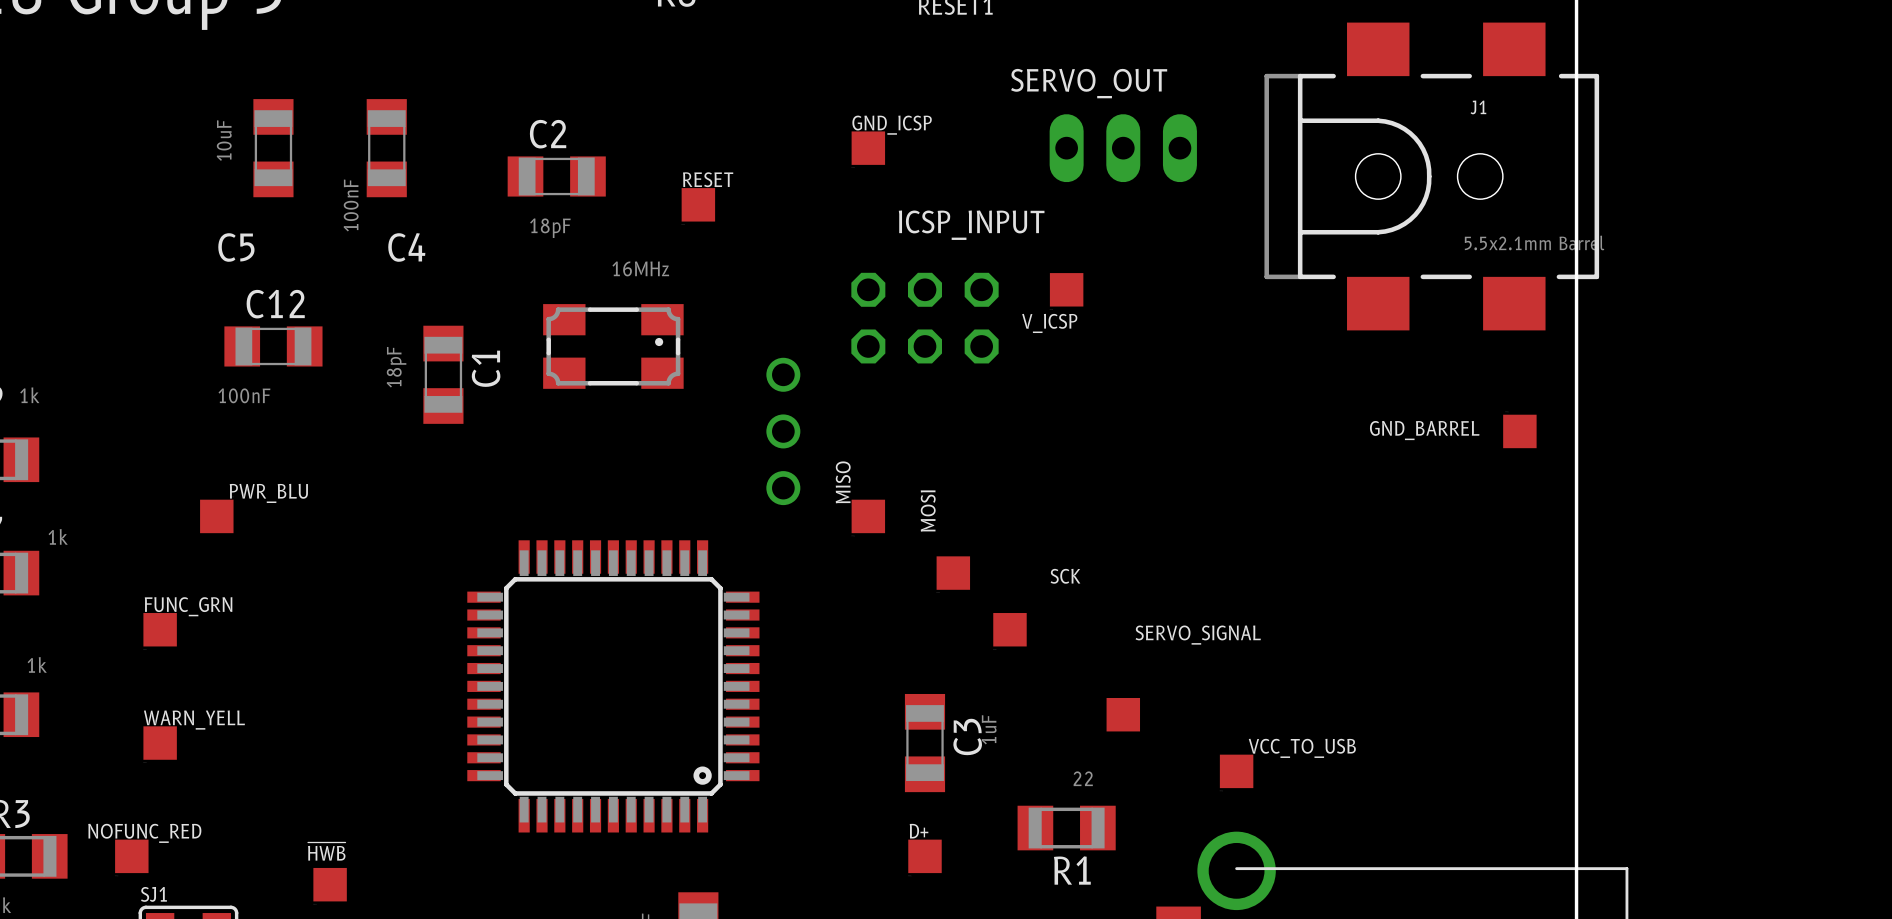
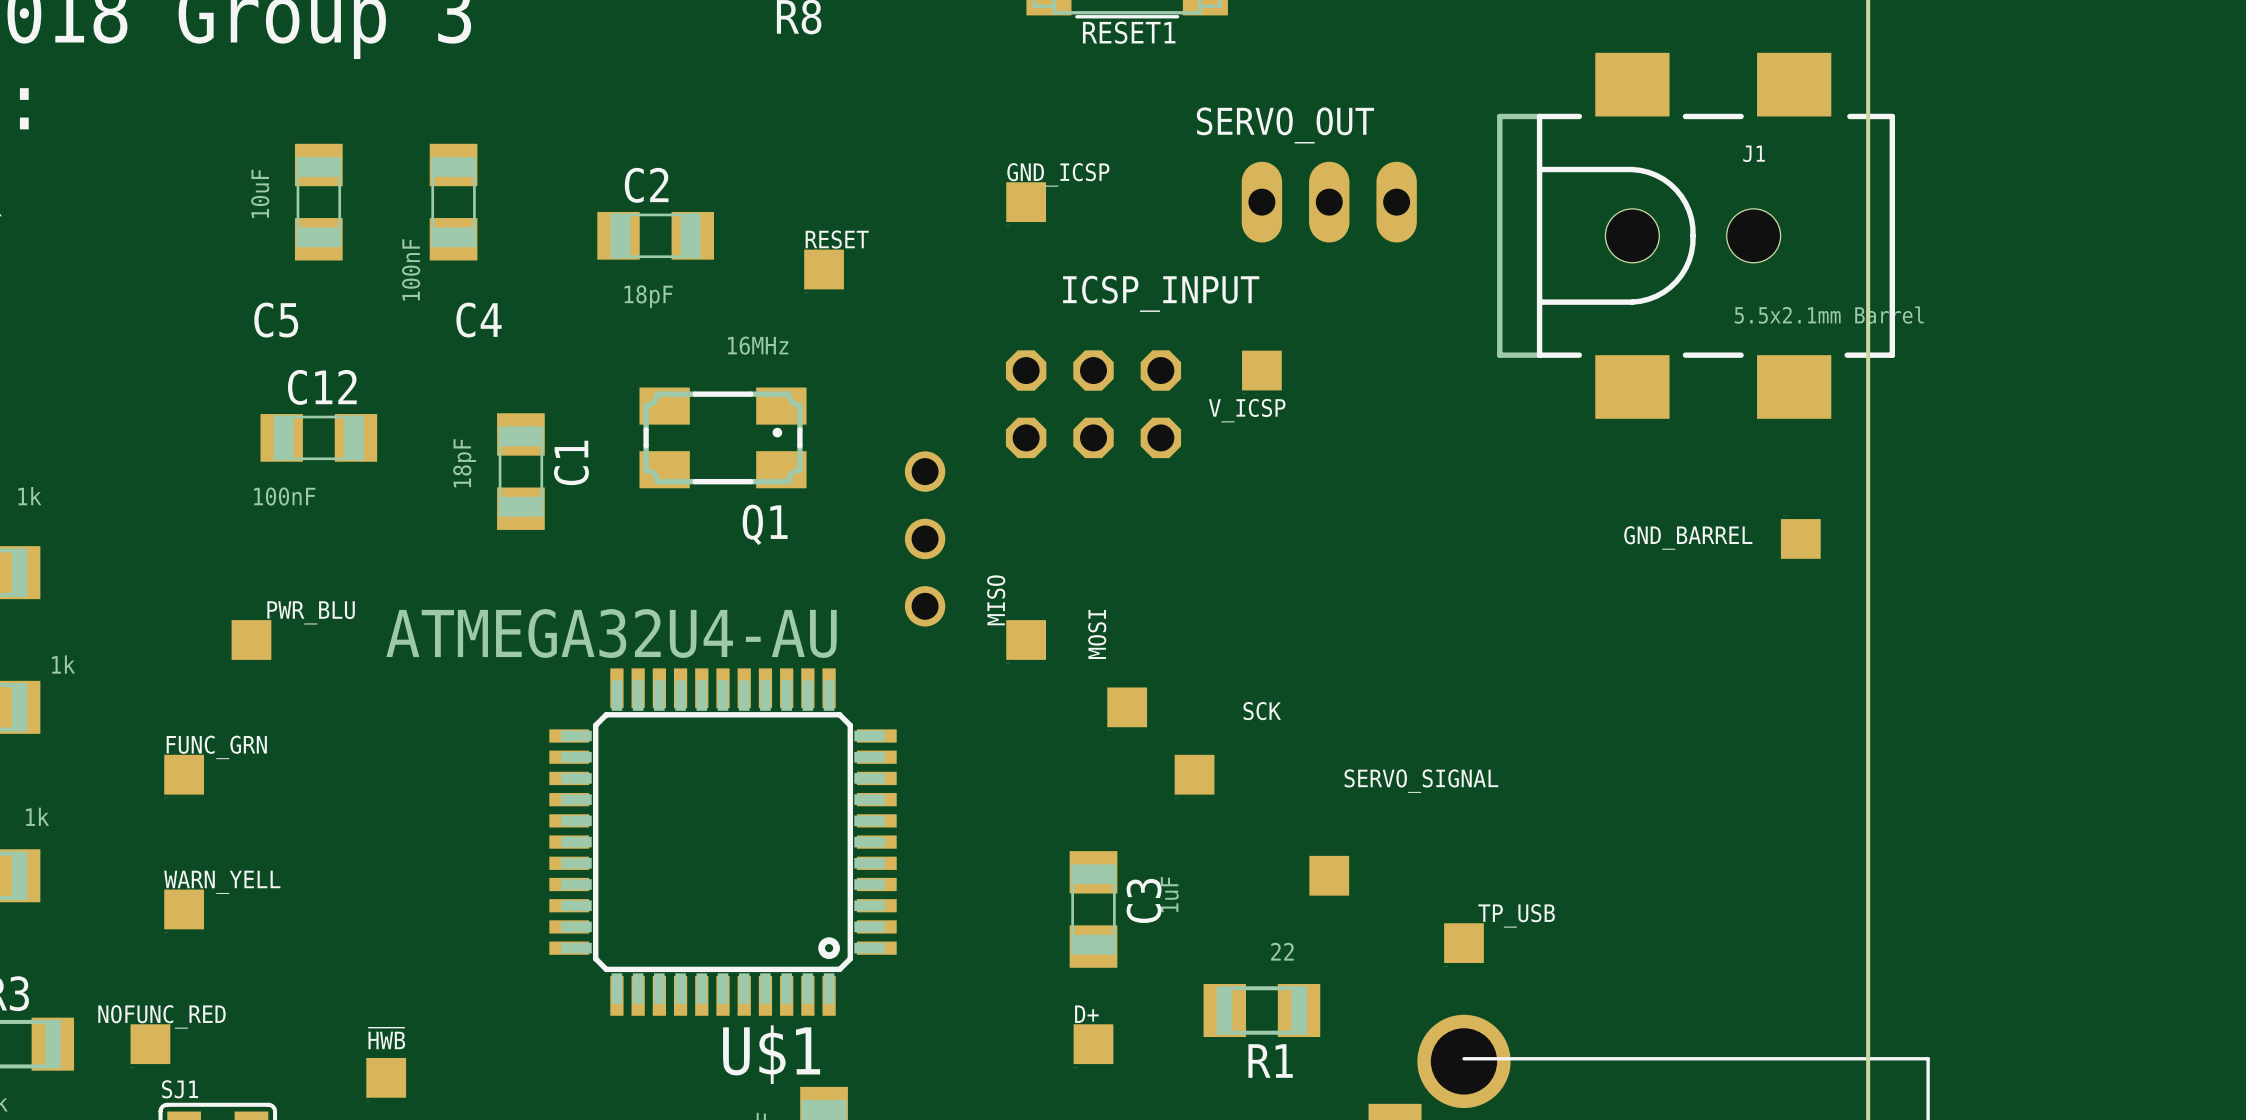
Q1 name: none -> Q1 (765, 524)
U$1 value: none -> ATMEGA32U4-AU (611, 633)
VCC_TO_USB name: VCC_TO_USB (1302, 748) -> TP_USB (1516, 915)
U$1 name: none -> U$1 (771, 1054)

